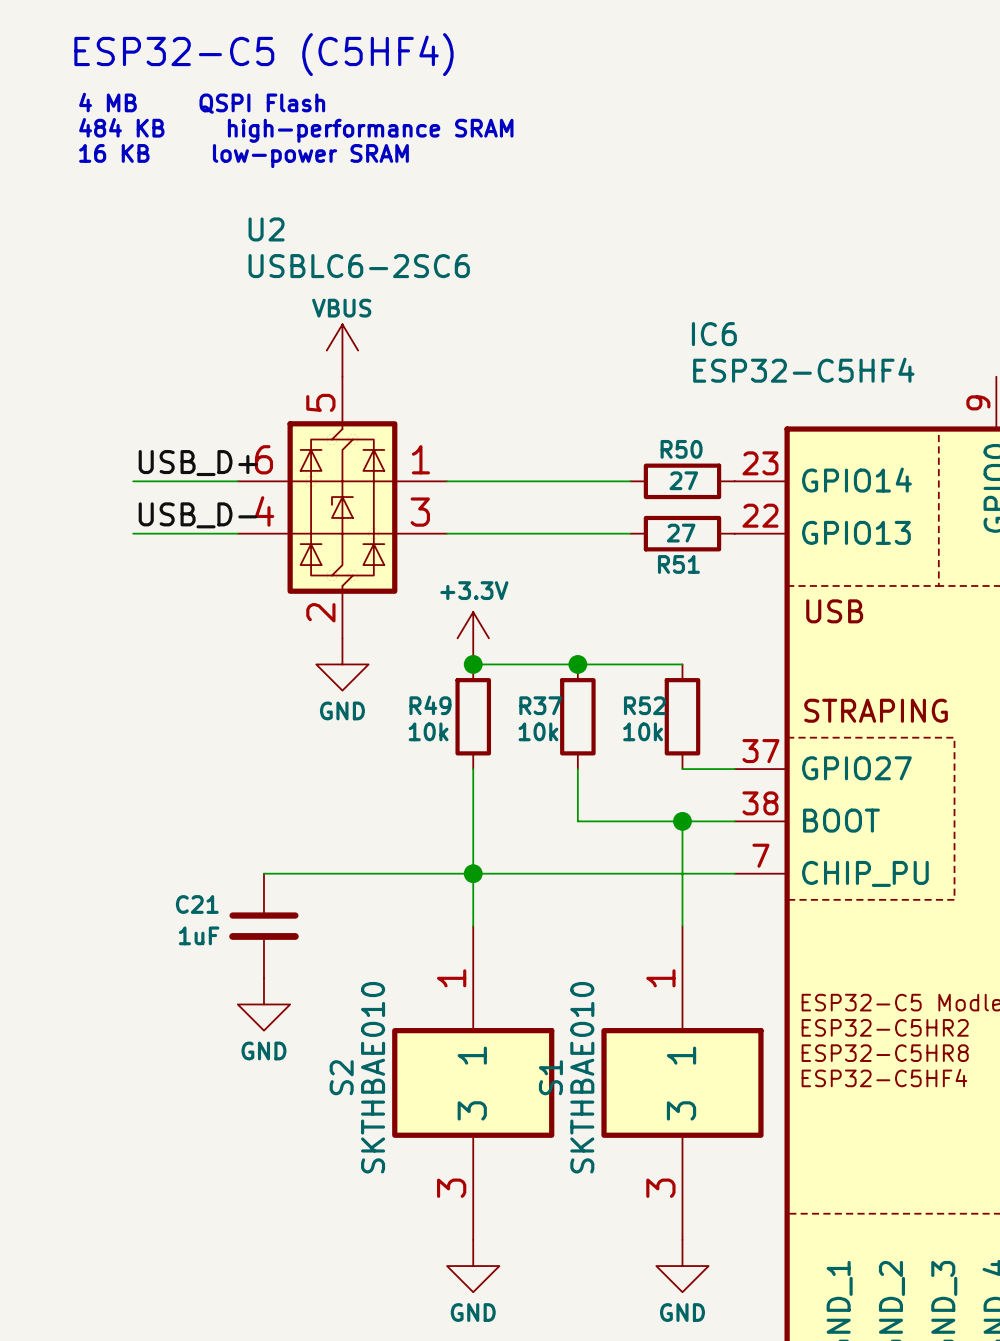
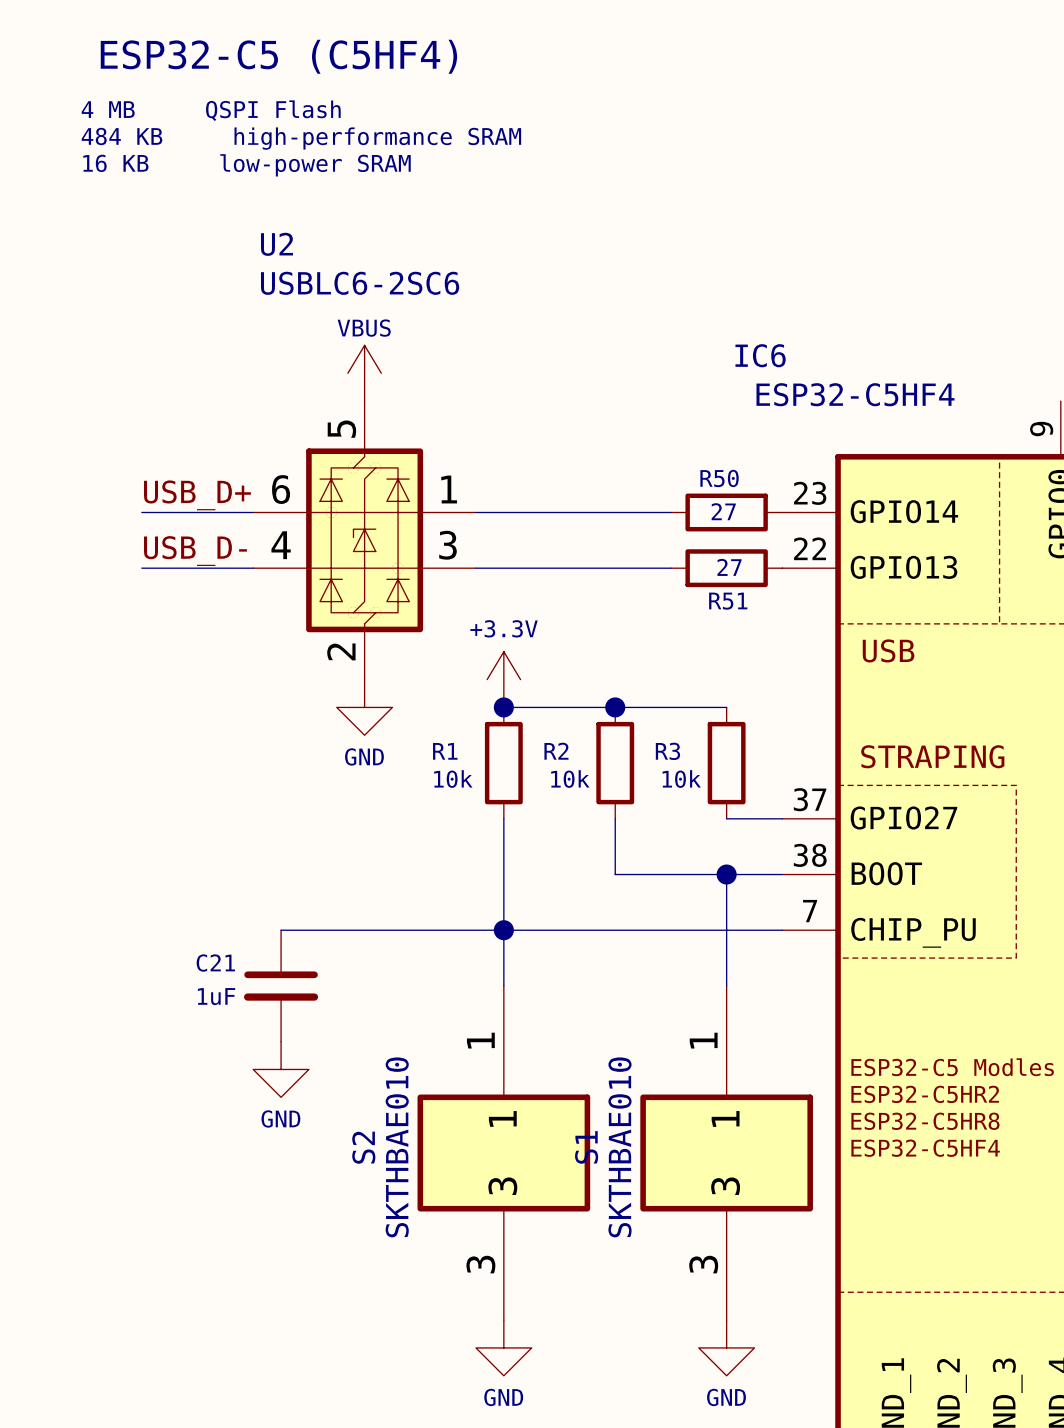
R49 name: R49 (430, 705) -> R1 (445, 751)
R37 name: R37 (540, 705) -> R2 (556, 751)
R52 name: R52 (644, 705) -> R3 (667, 751)

